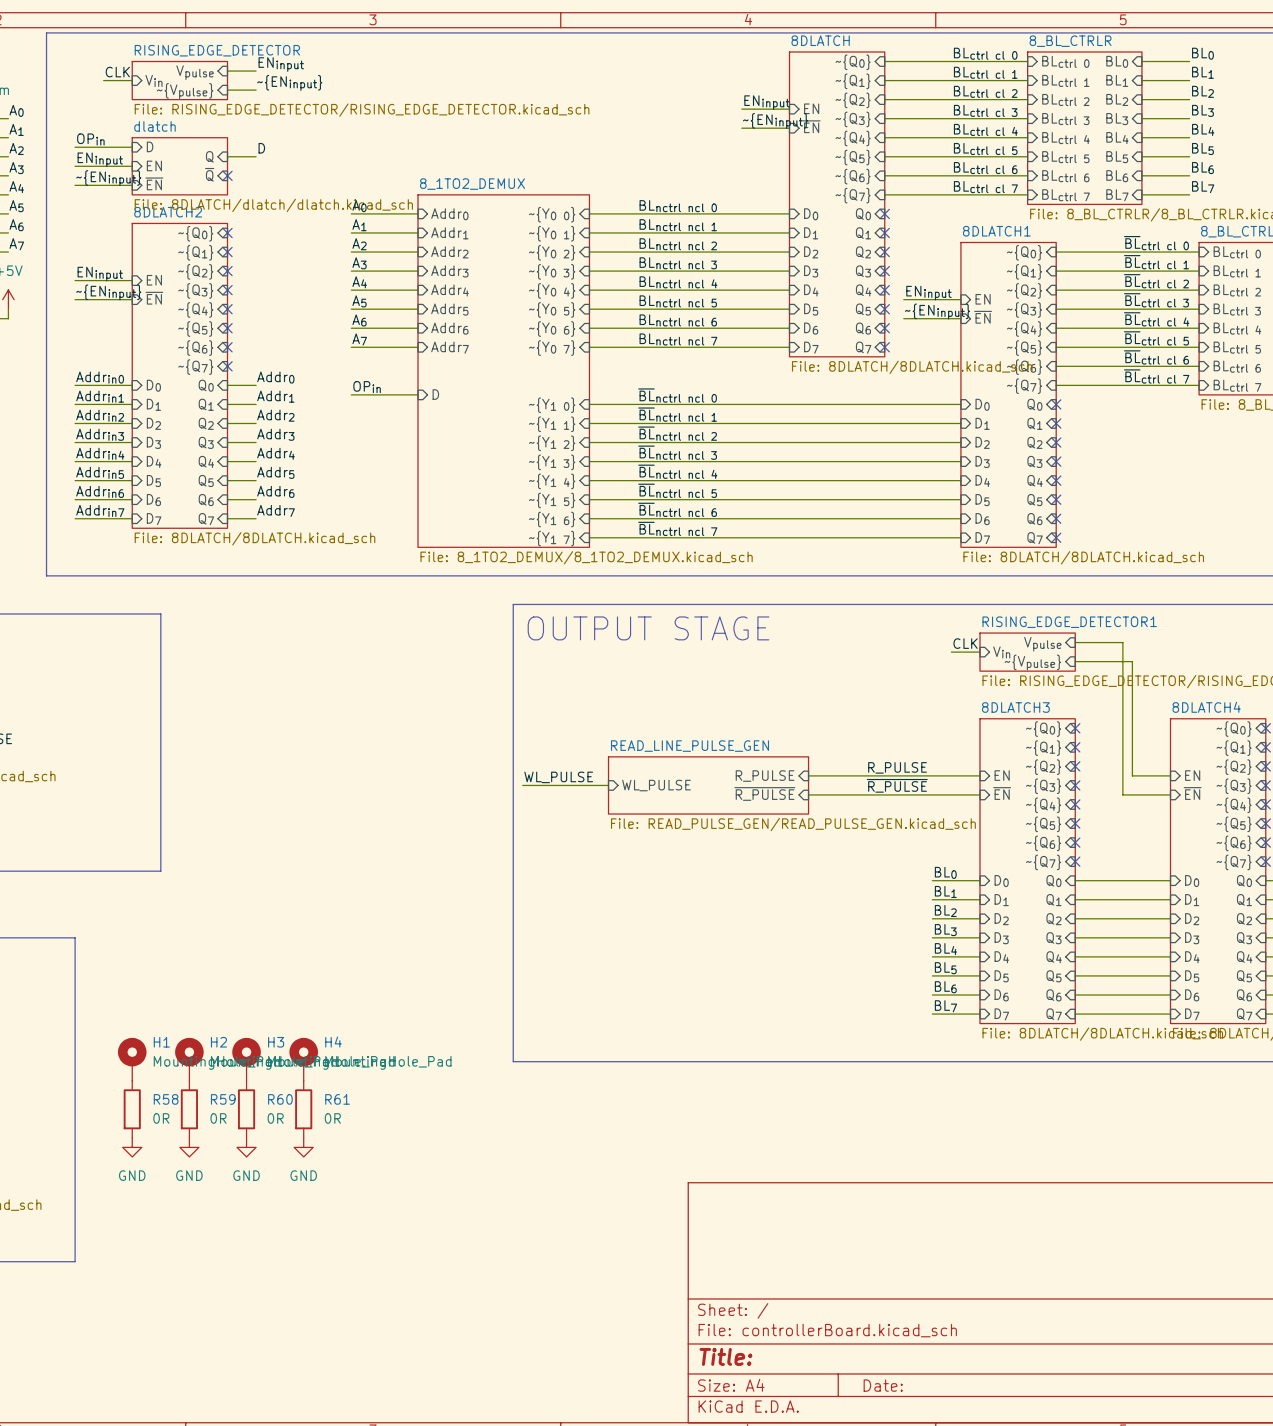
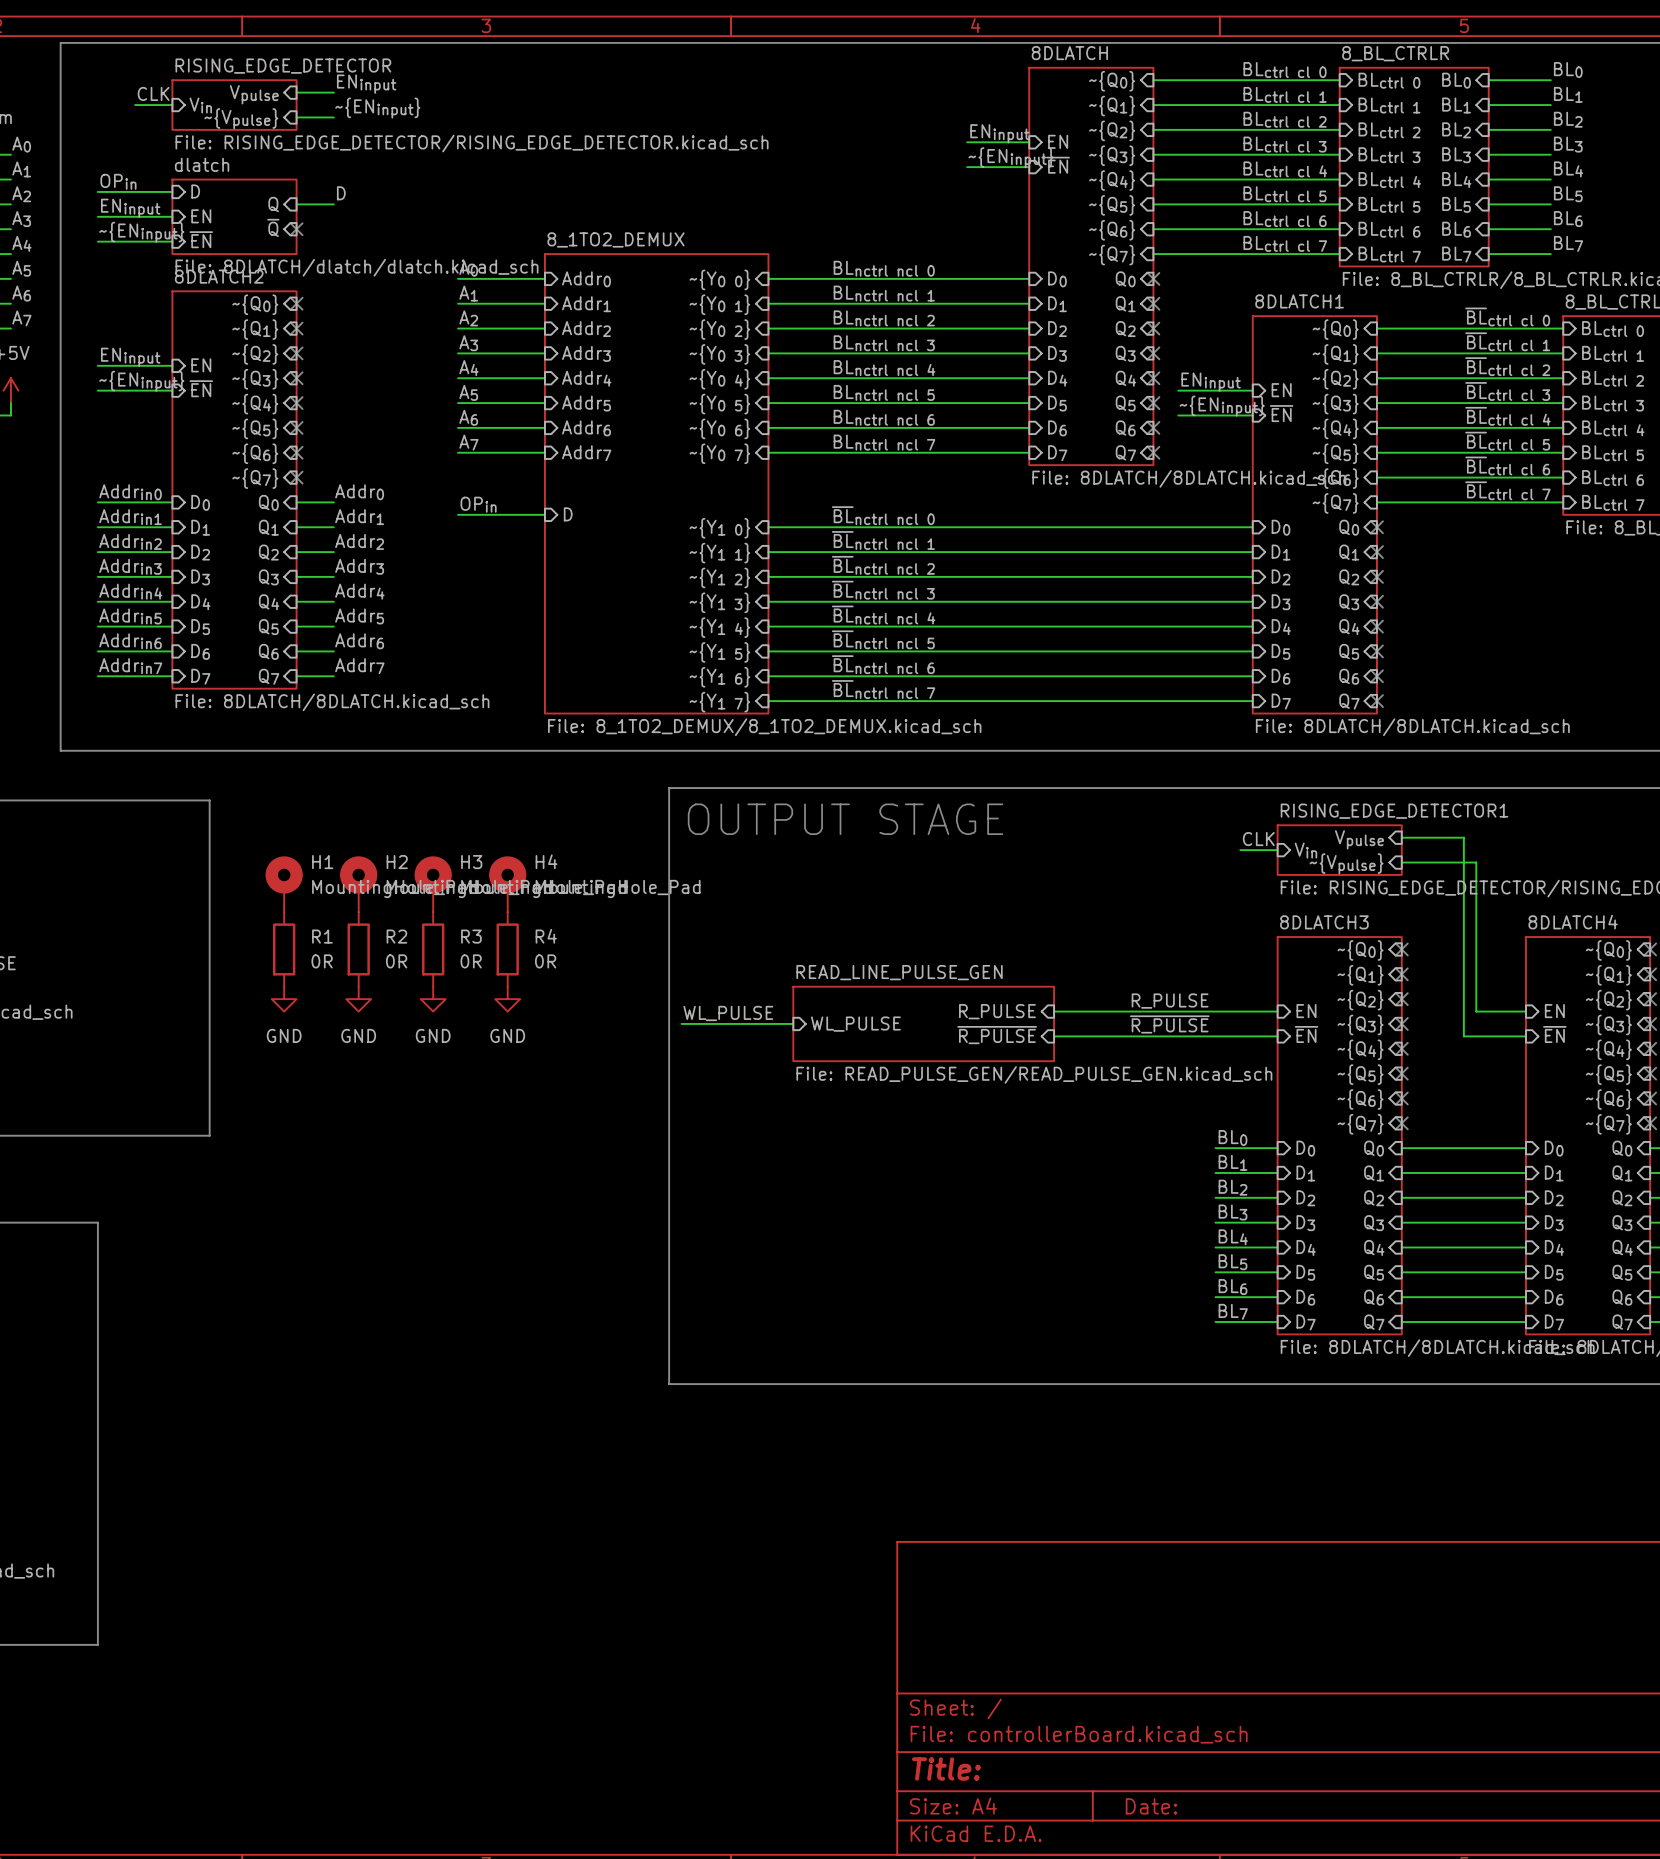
R1: none -> 0R (284, 949)
R2: none -> 0R (358, 949)
R3: none -> 0R (433, 949)
R4: none -> 0R (507, 949)
power symbol: none -> GND (284, 999)
power symbol: none -> GND (358, 999)
power symbol: none -> GND (433, 999)
power symbol: none -> GND (507, 999)
H1 position: (132, 1059) -> (284, 884)
H2 position: (189, 1059) -> (358, 884)
H3 position: (246, 1059) -> (433, 884)
H4 position: (303, 1059) -> (507, 884)
R58: 0R (132, 1109) -> none
R59: 0R (189, 1109) -> none
R60: 0R (246, 1109) -> none
R61: 0R (303, 1109) -> none
power symbol: GND (132, 1147) -> none
power symbol: GND (189, 1147) -> none
power symbol: GND (246, 1147) -> none
power symbol: GND (303, 1147) -> none

